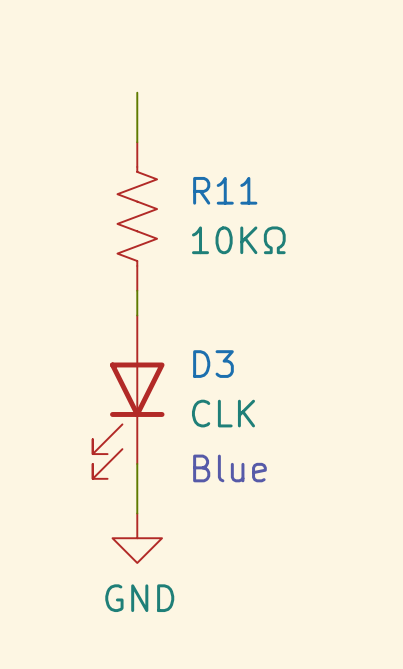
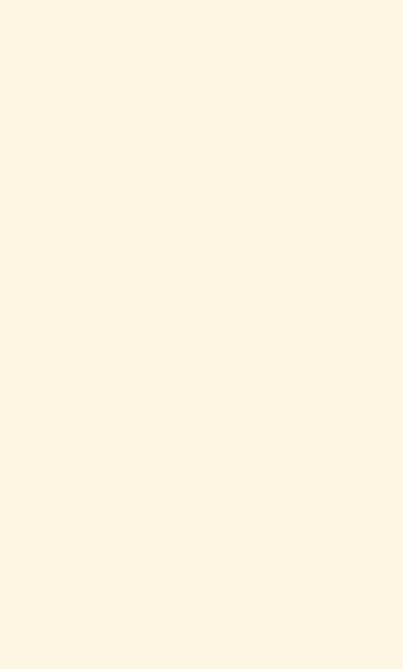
wire: (137, 92) (137, 142) -> none
R11: 10KΩ (137, 216) -> none
wire: (137, 290) (137, 315) -> none
D3: CLK (128, 397) -> none
wire: (137, 463) (137, 513) -> none
text: Blue (229, 468) -> none
power symbol: GND (137, 538) -> none

